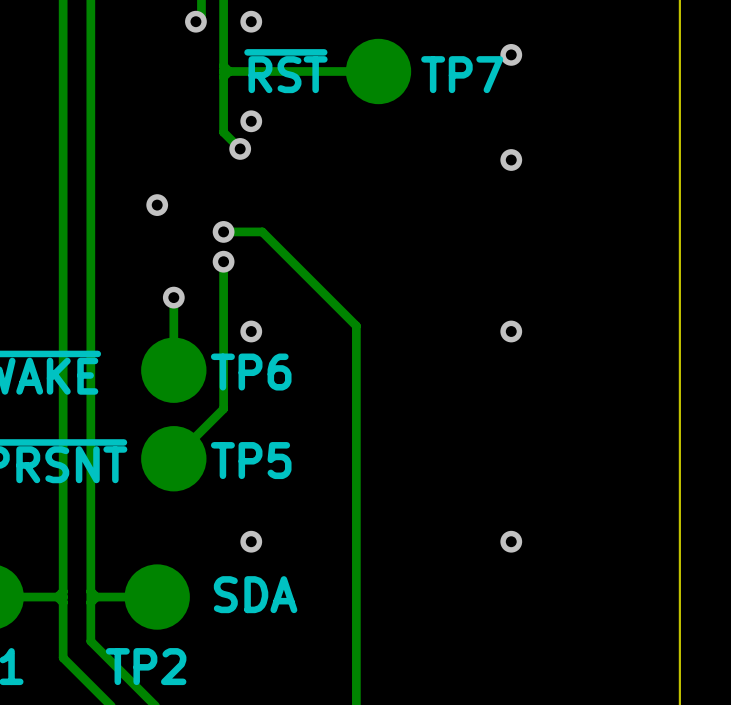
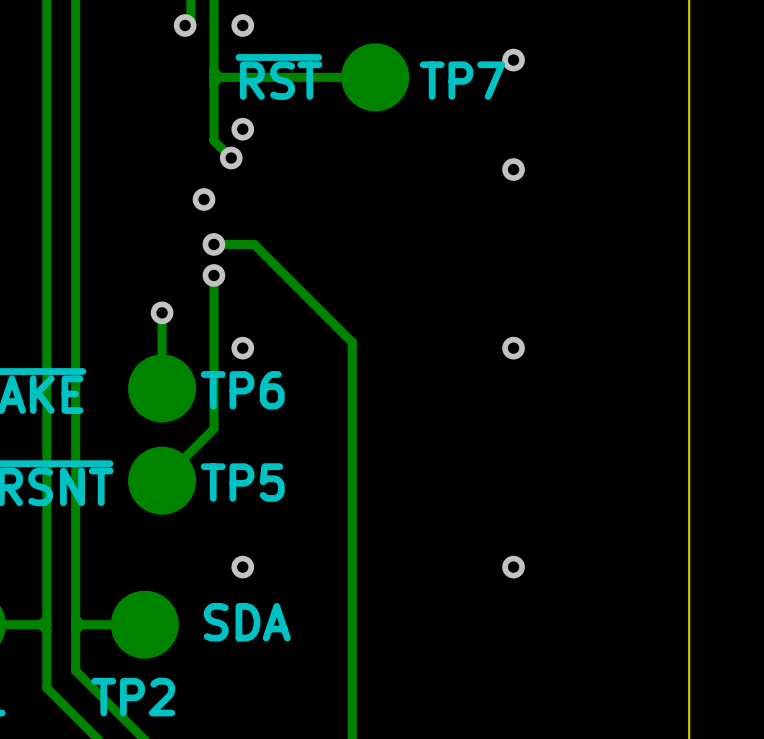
via position: (157, 205) -> (204, 199)

